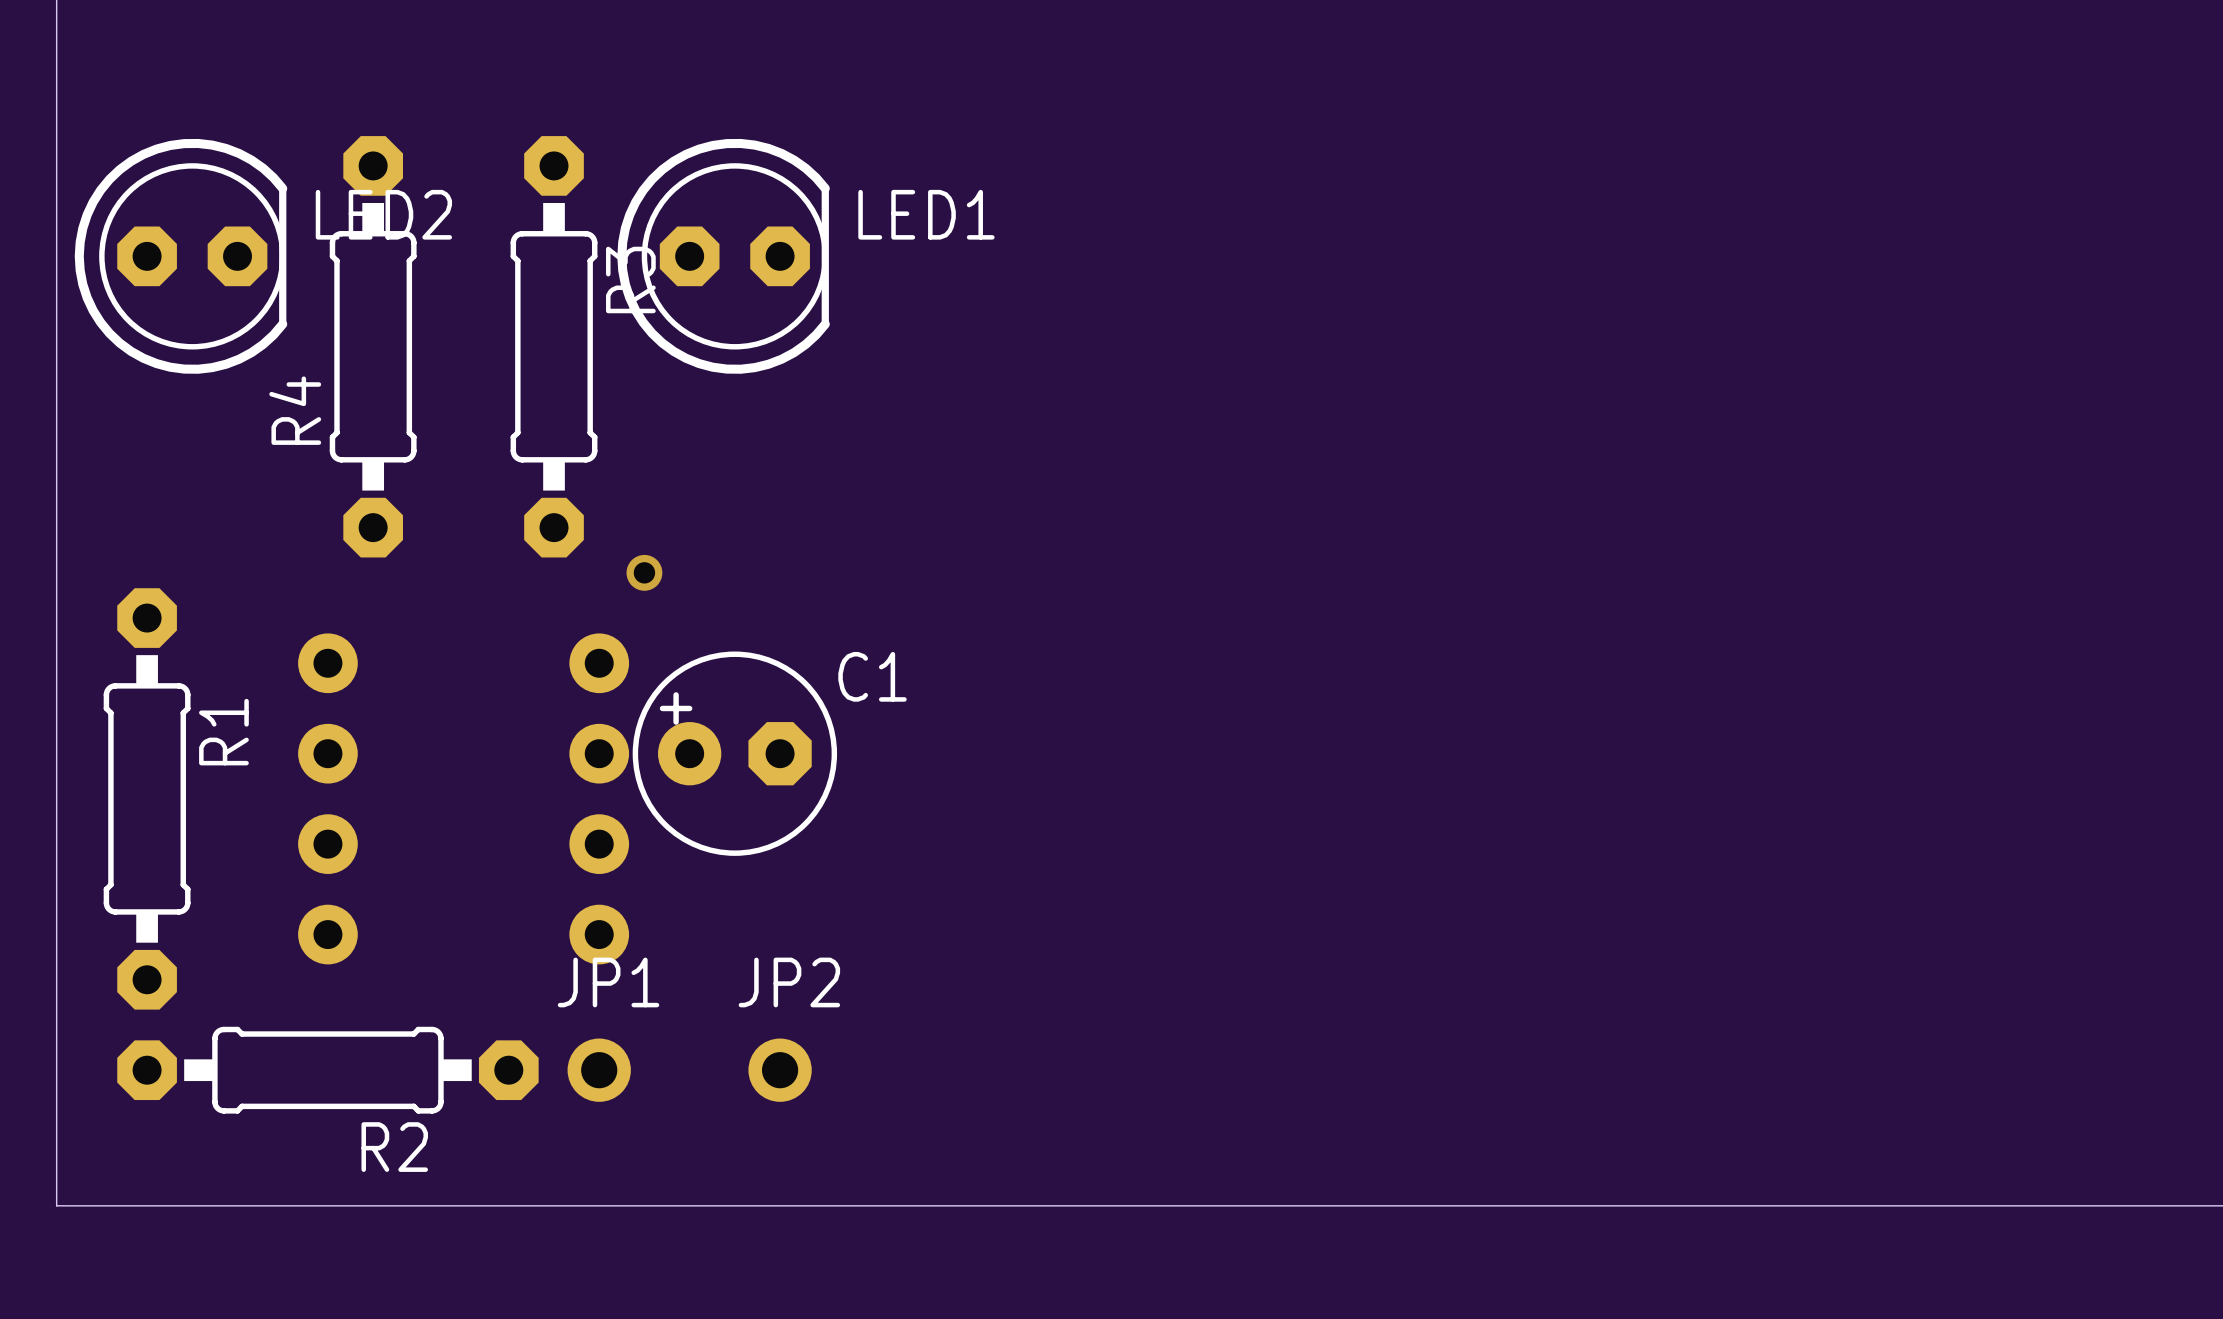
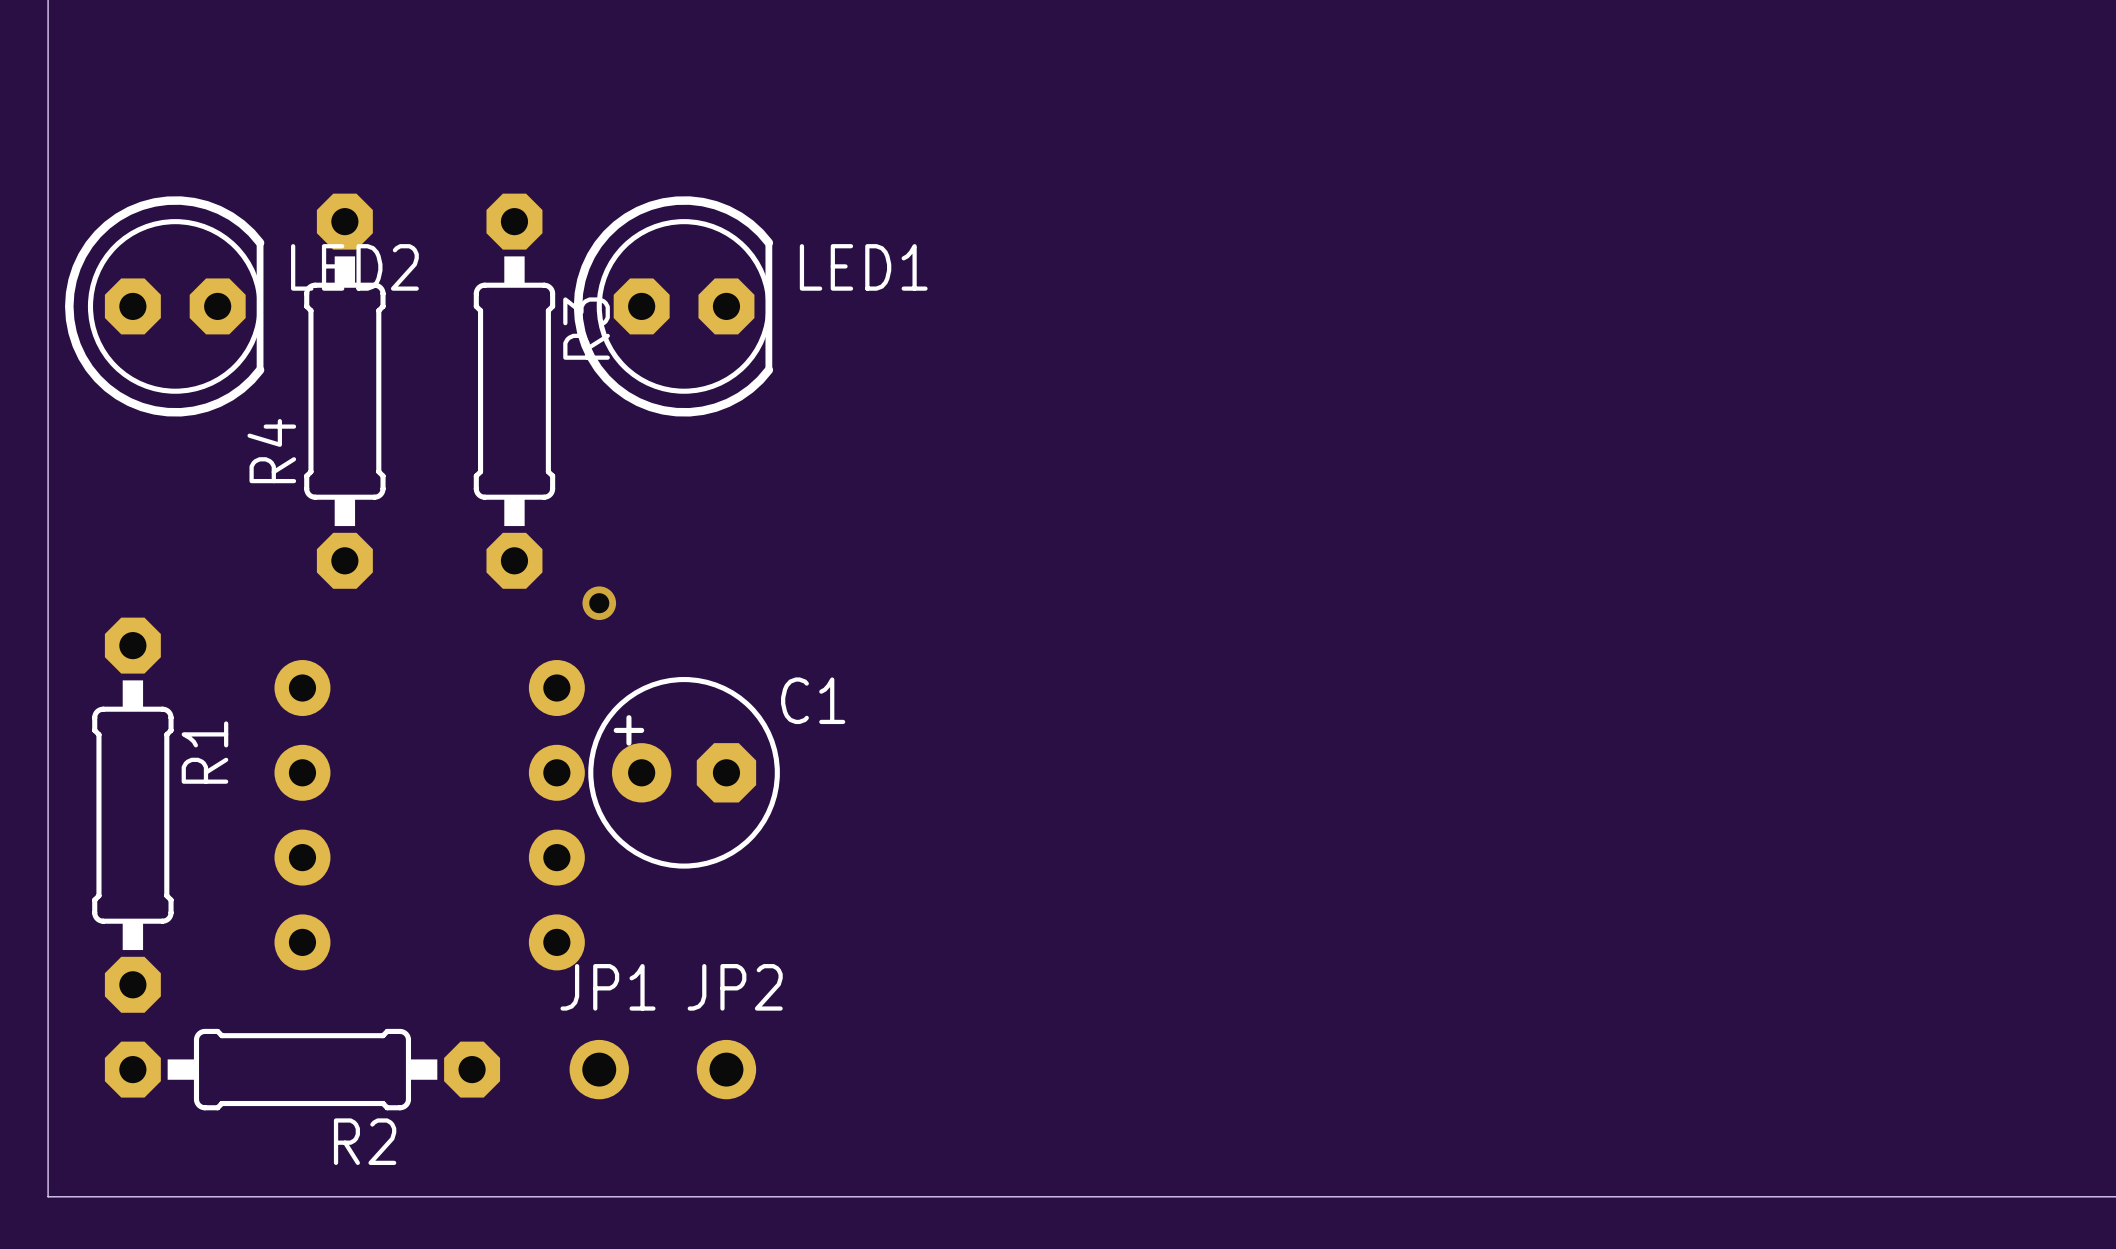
JP1 position: (599, 1070) -> (599, 1069)

